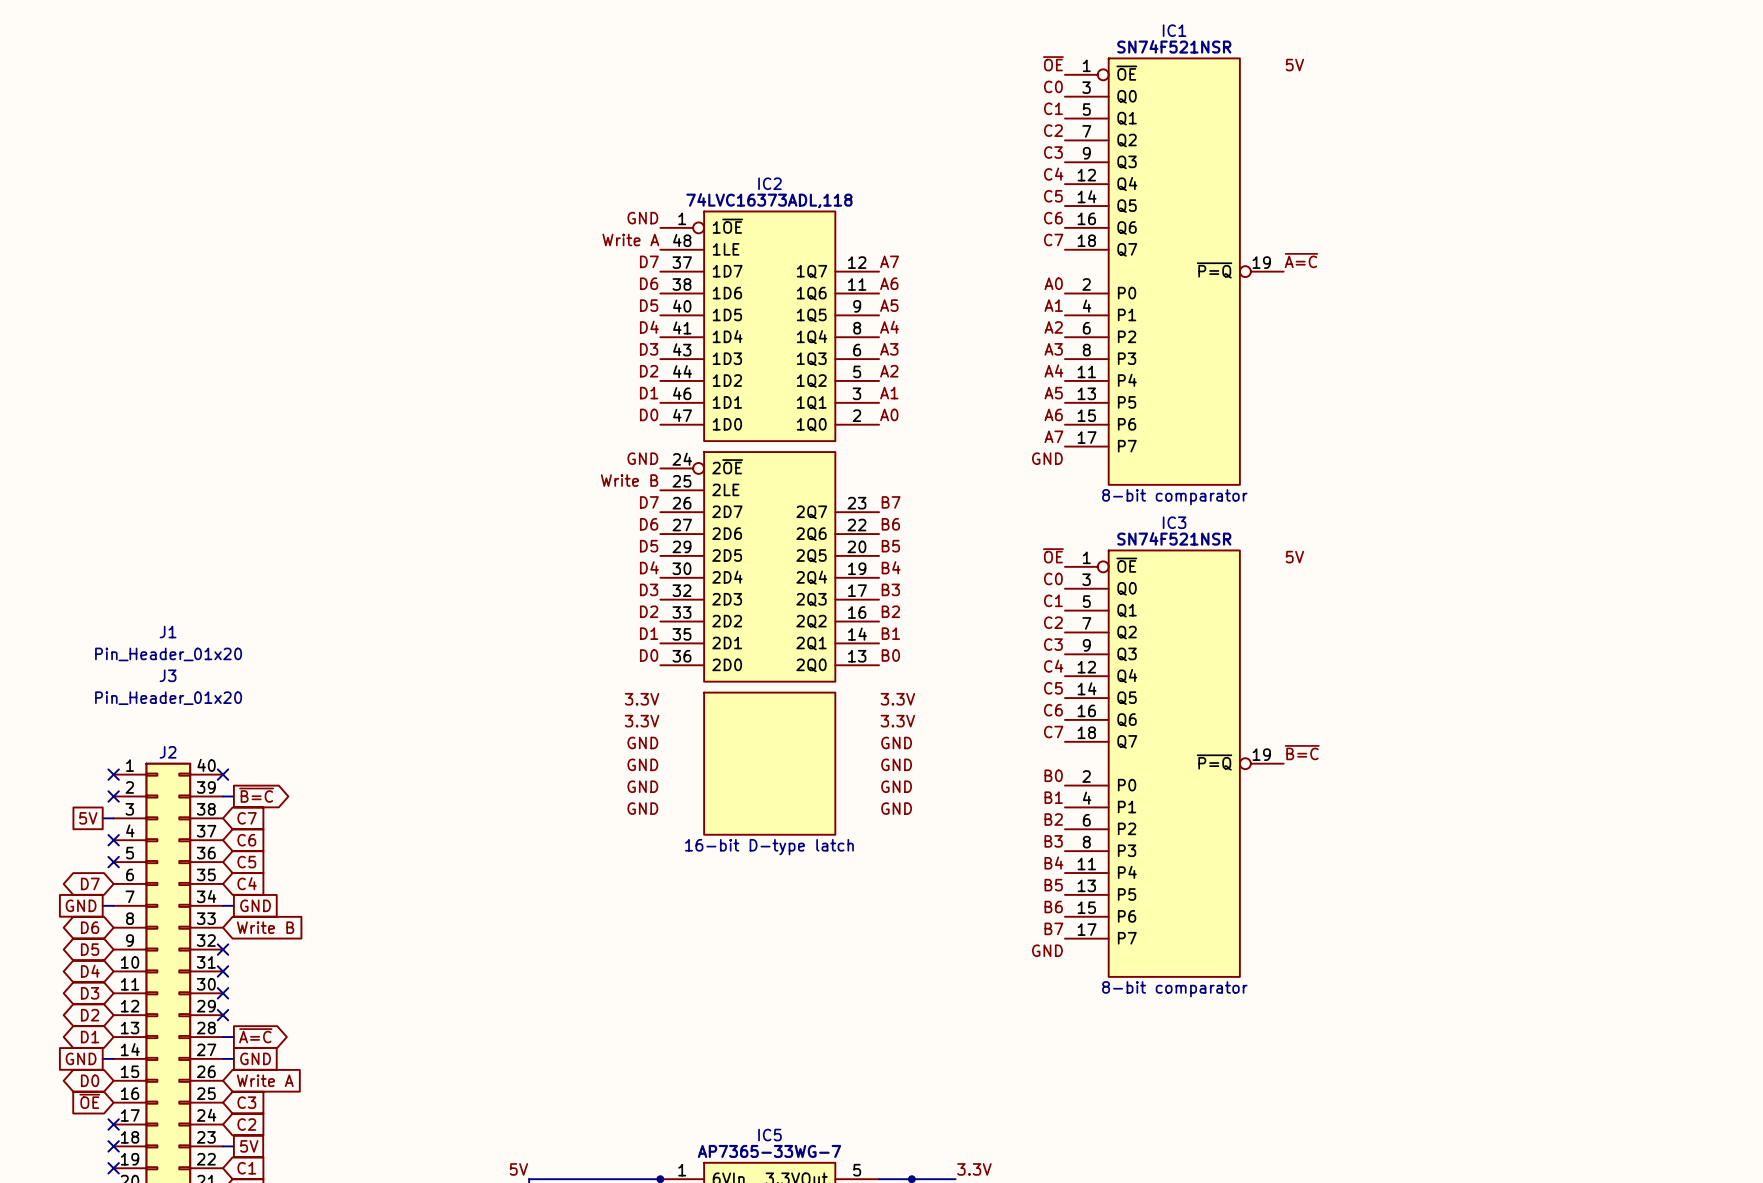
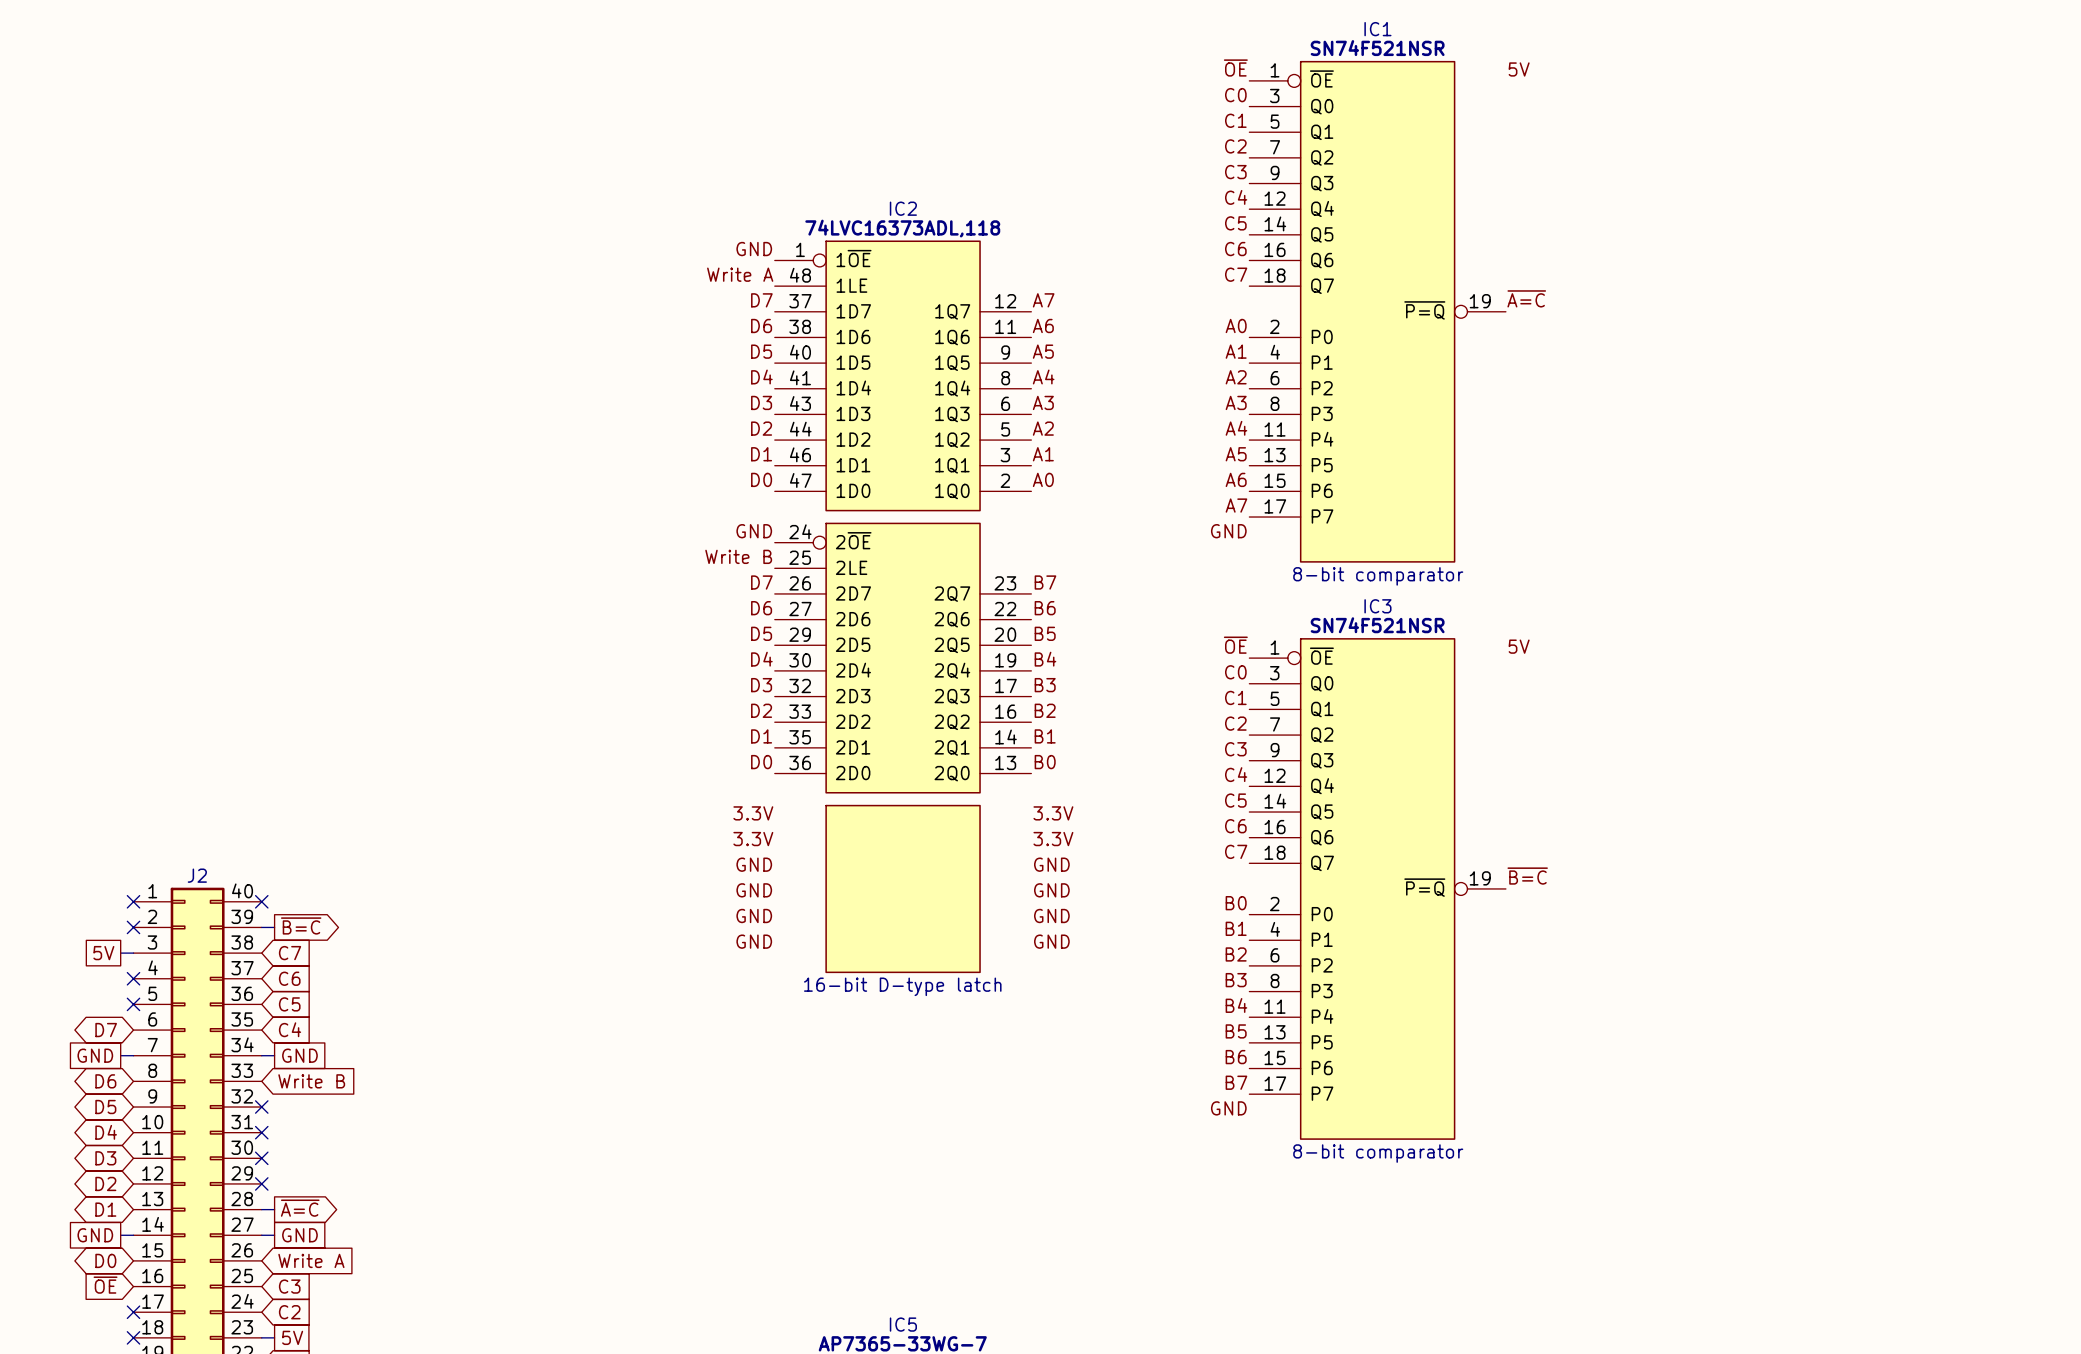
J1: Pin_Header_01x20 (168, 643) -> none
J3: Pin_Header_01x20 (168, 687) -> none

